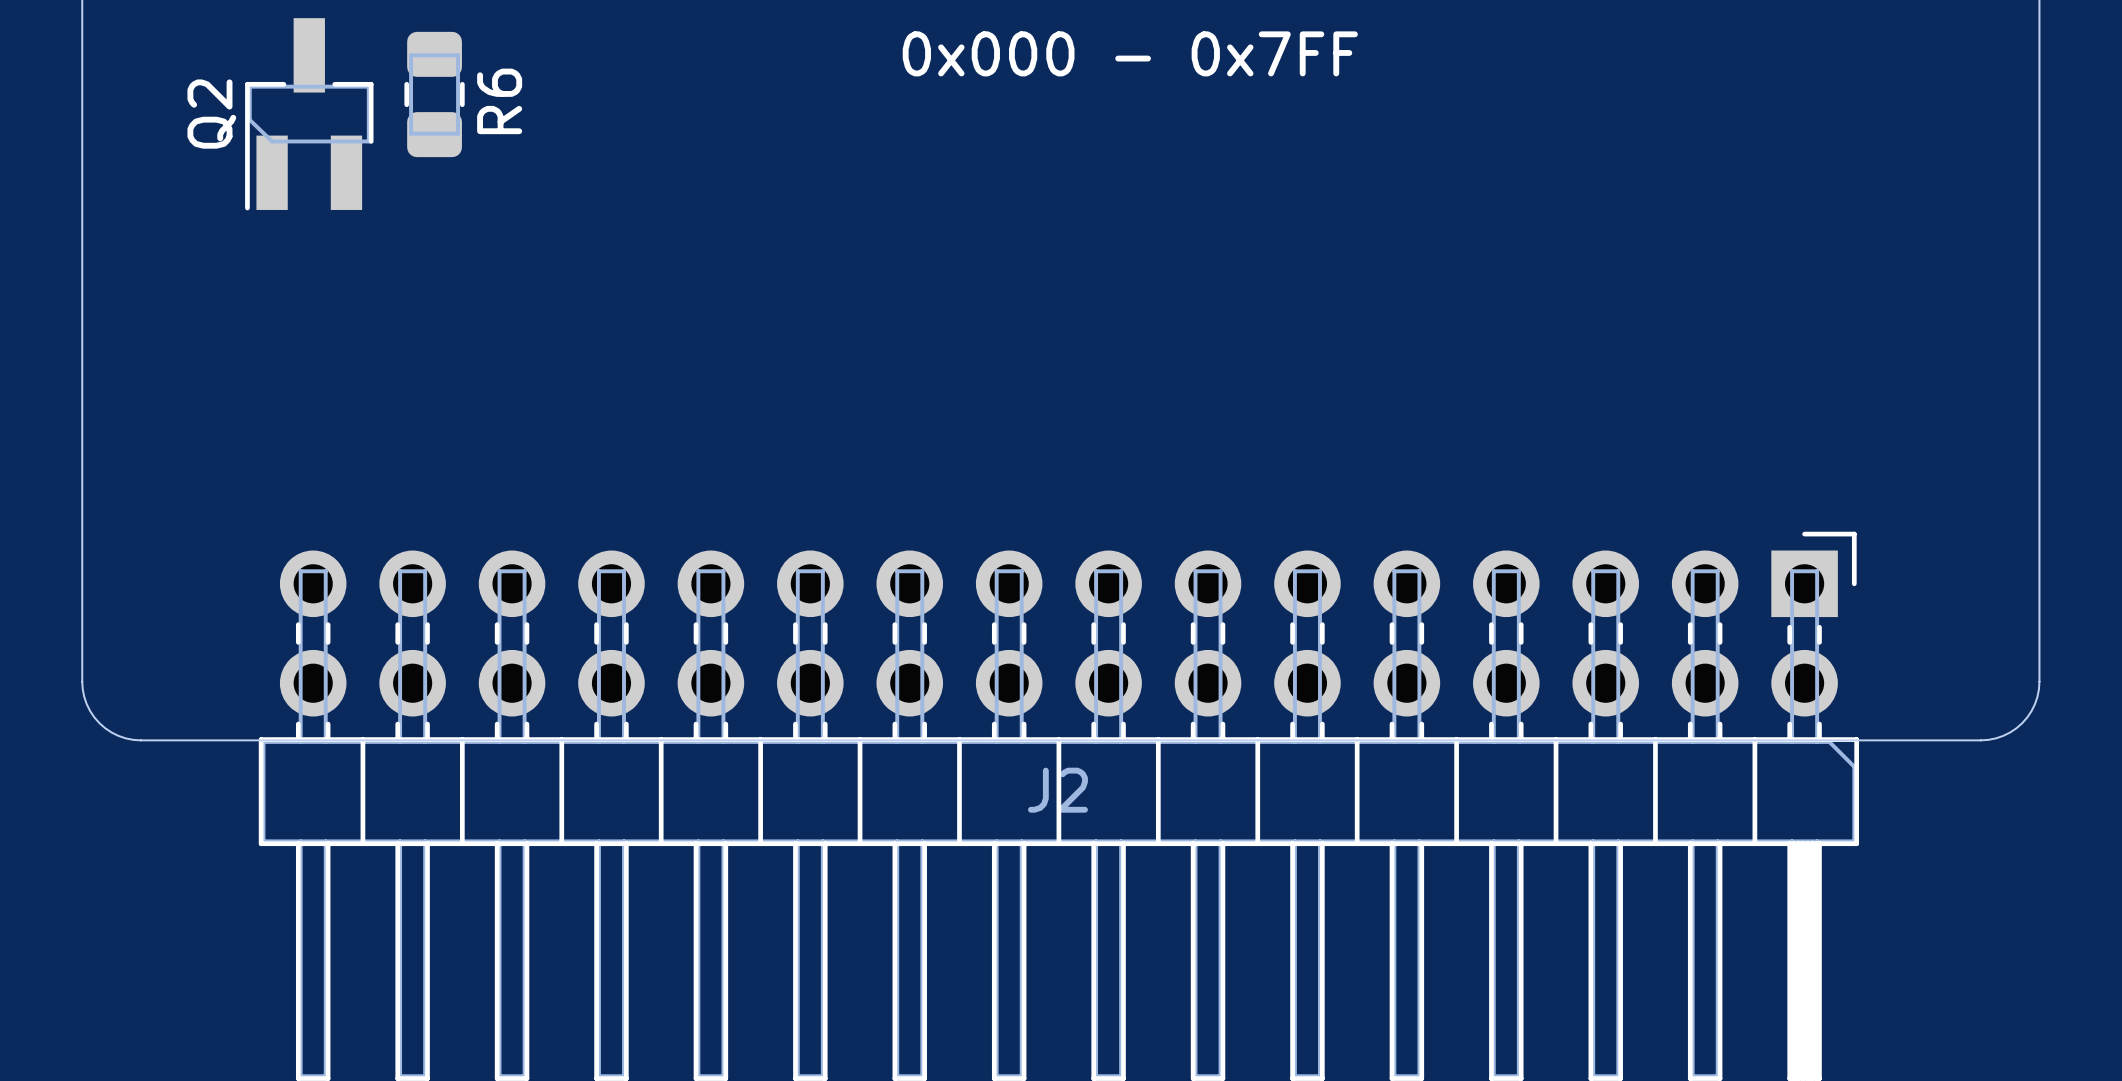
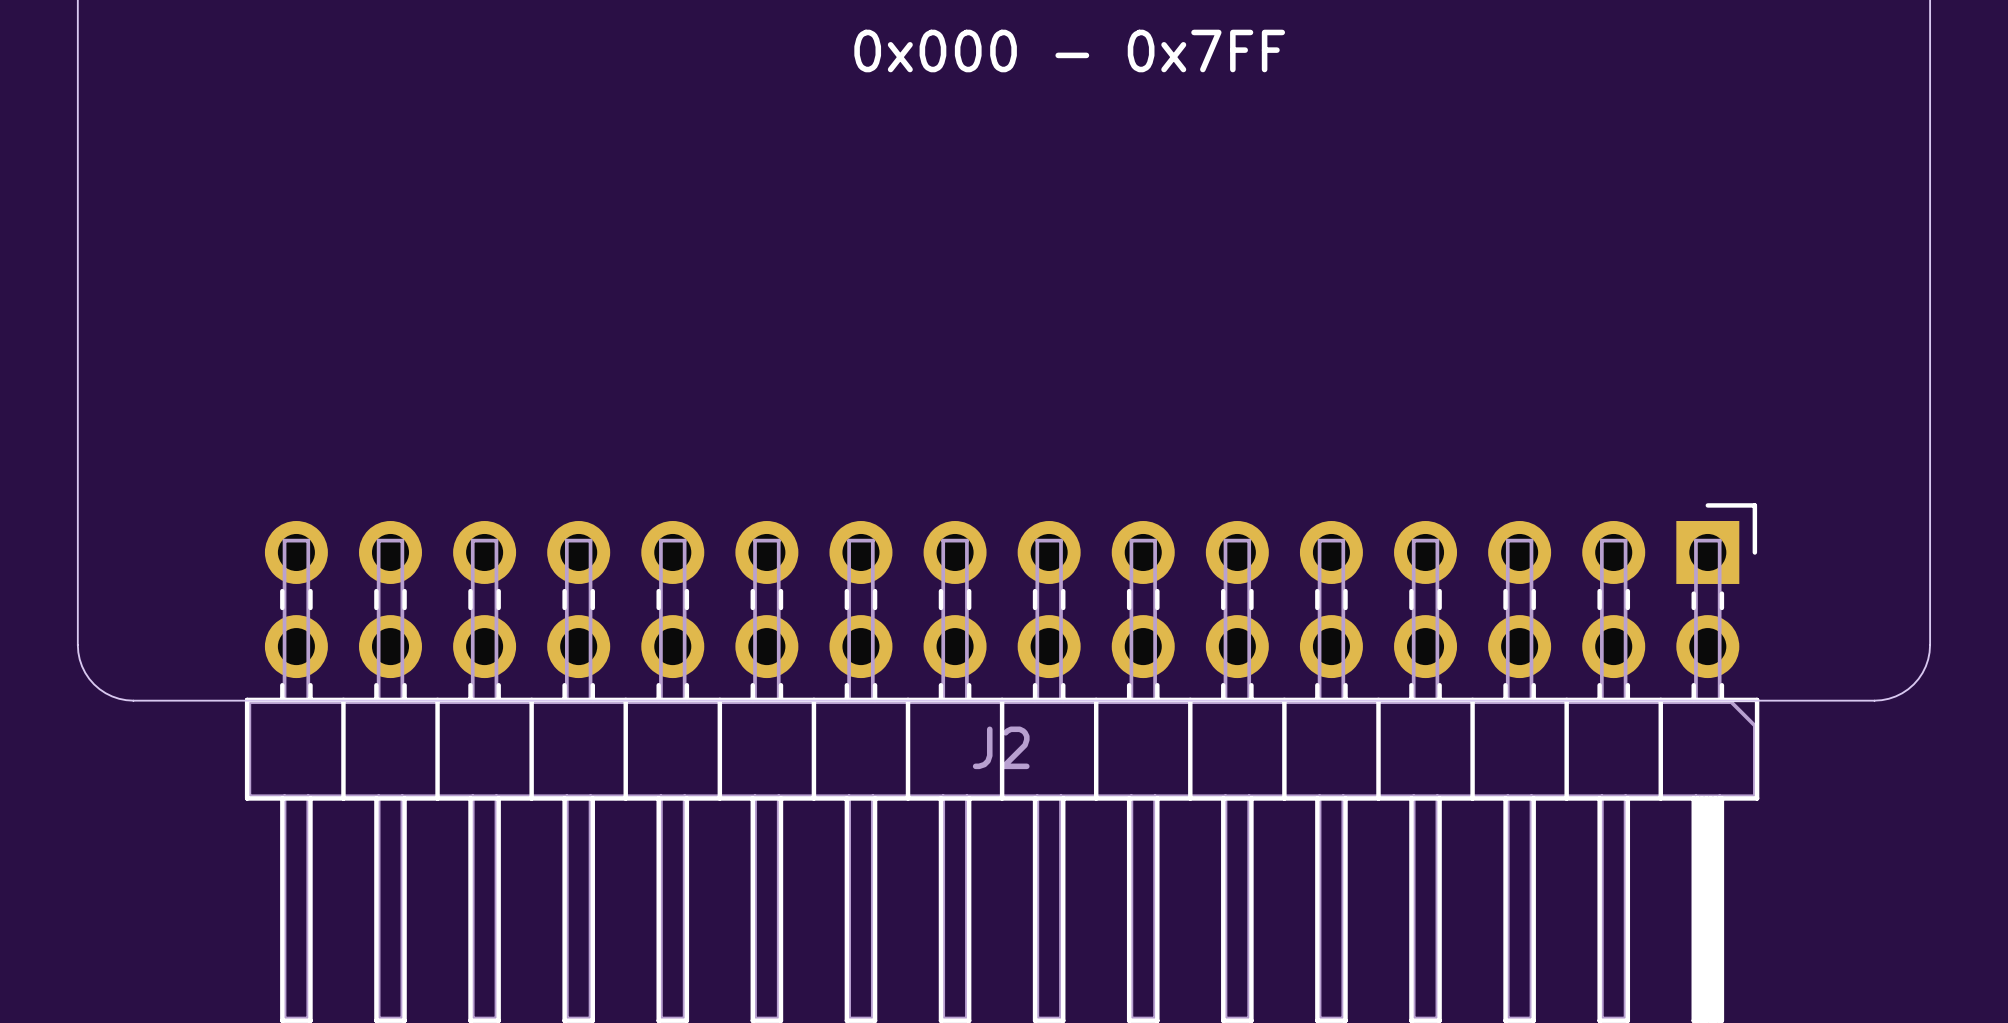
R6: (434, 94) -> none
Q2: (309, 114) -> none

